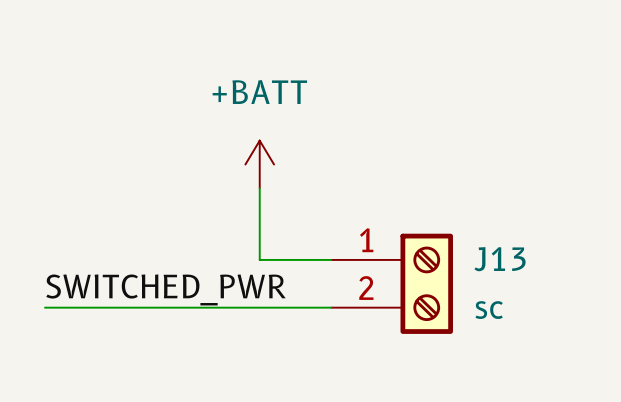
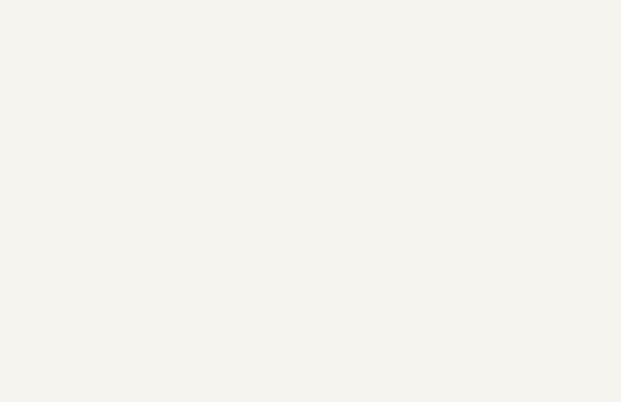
power symbol: +BATT (259, 164) -> none
wire: (259, 188) (259, 259) (331, 259) -> none
J13: sc (392, 283) -> none
label: SWITCHED_PWR (165, 289) -> none
wire: (45, 307) (331, 307) -> none

